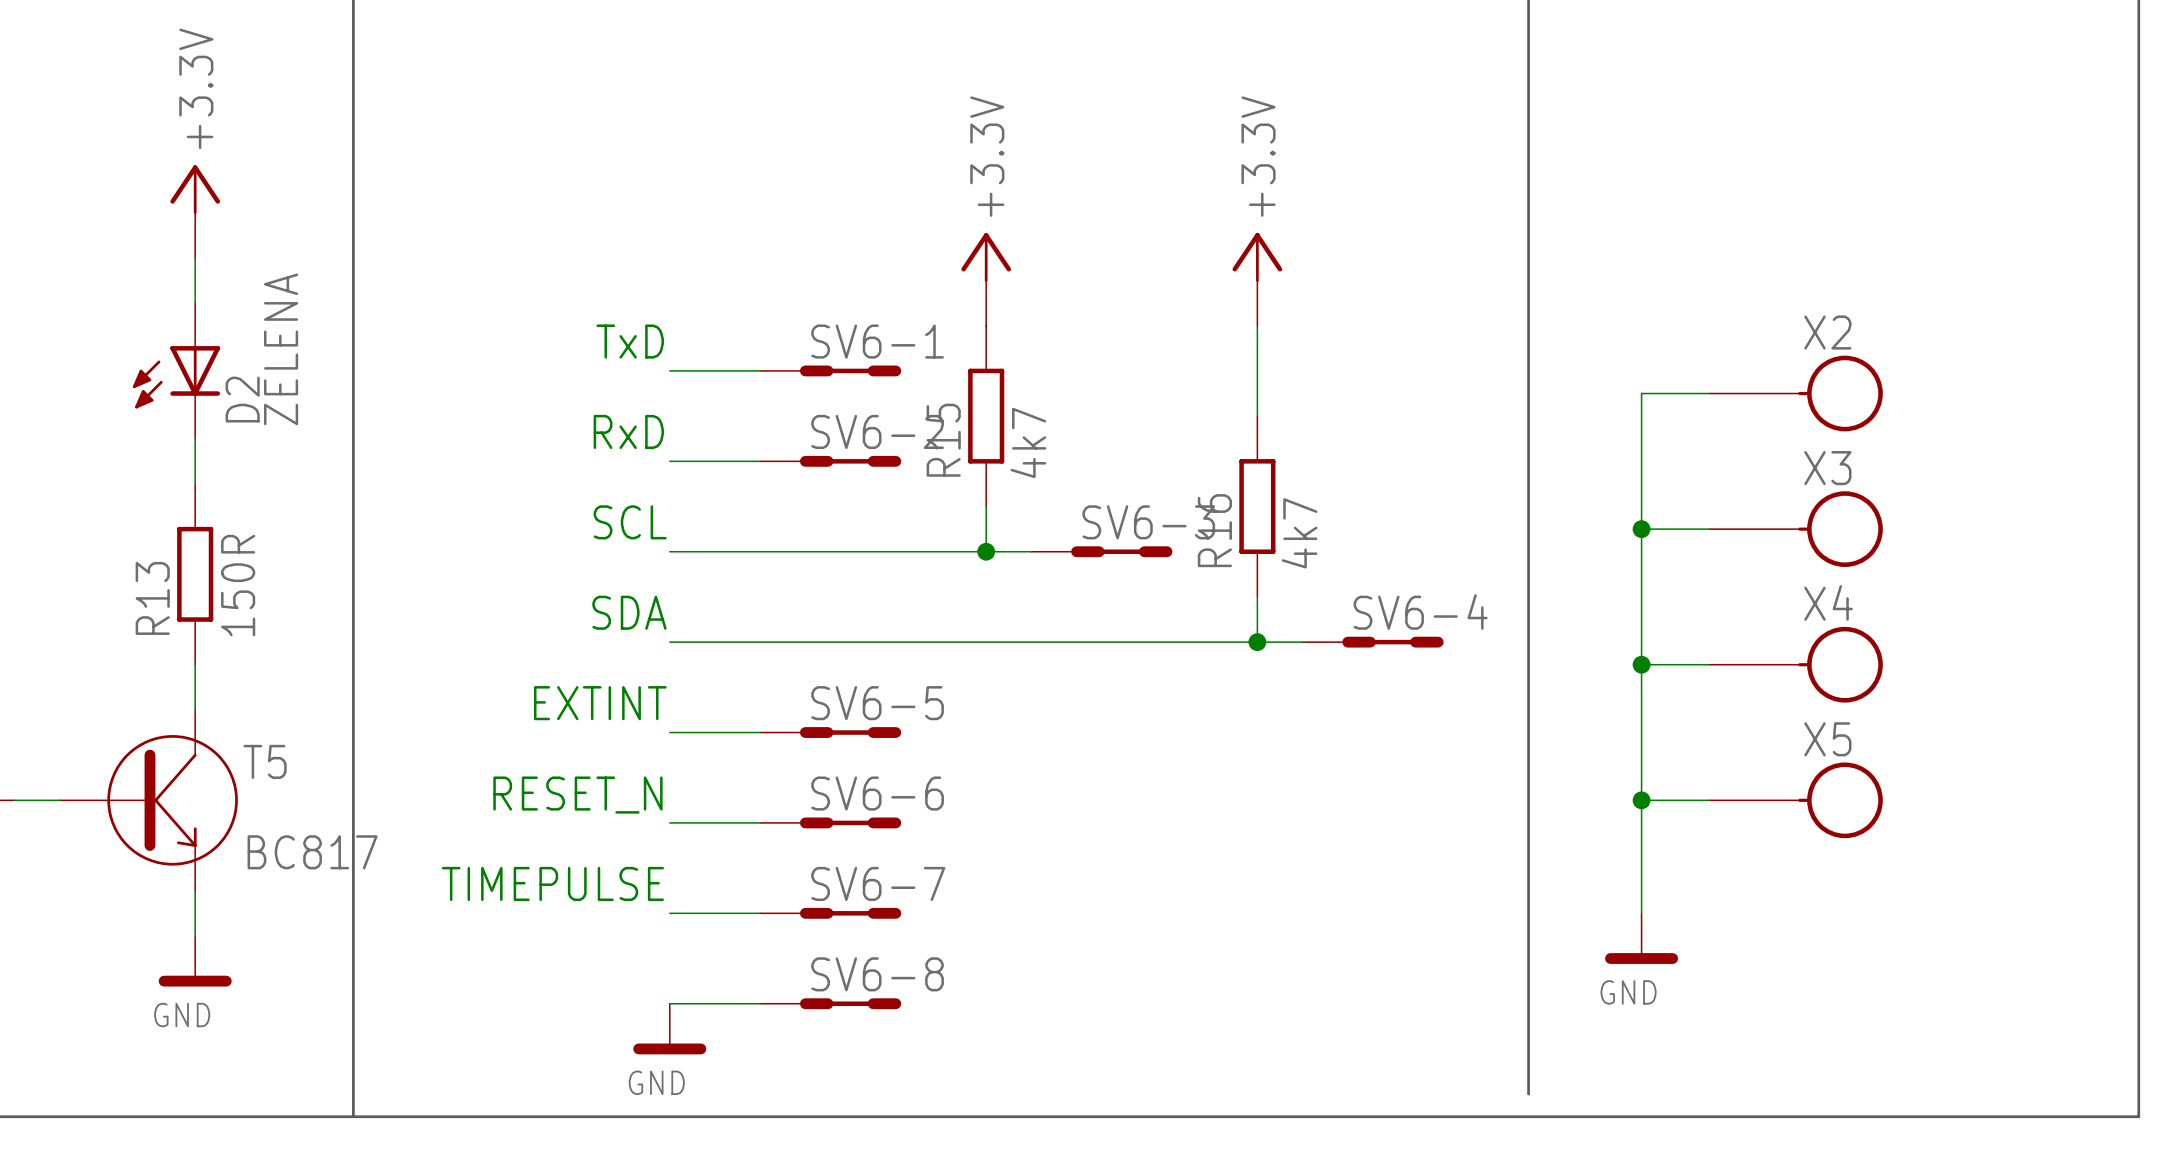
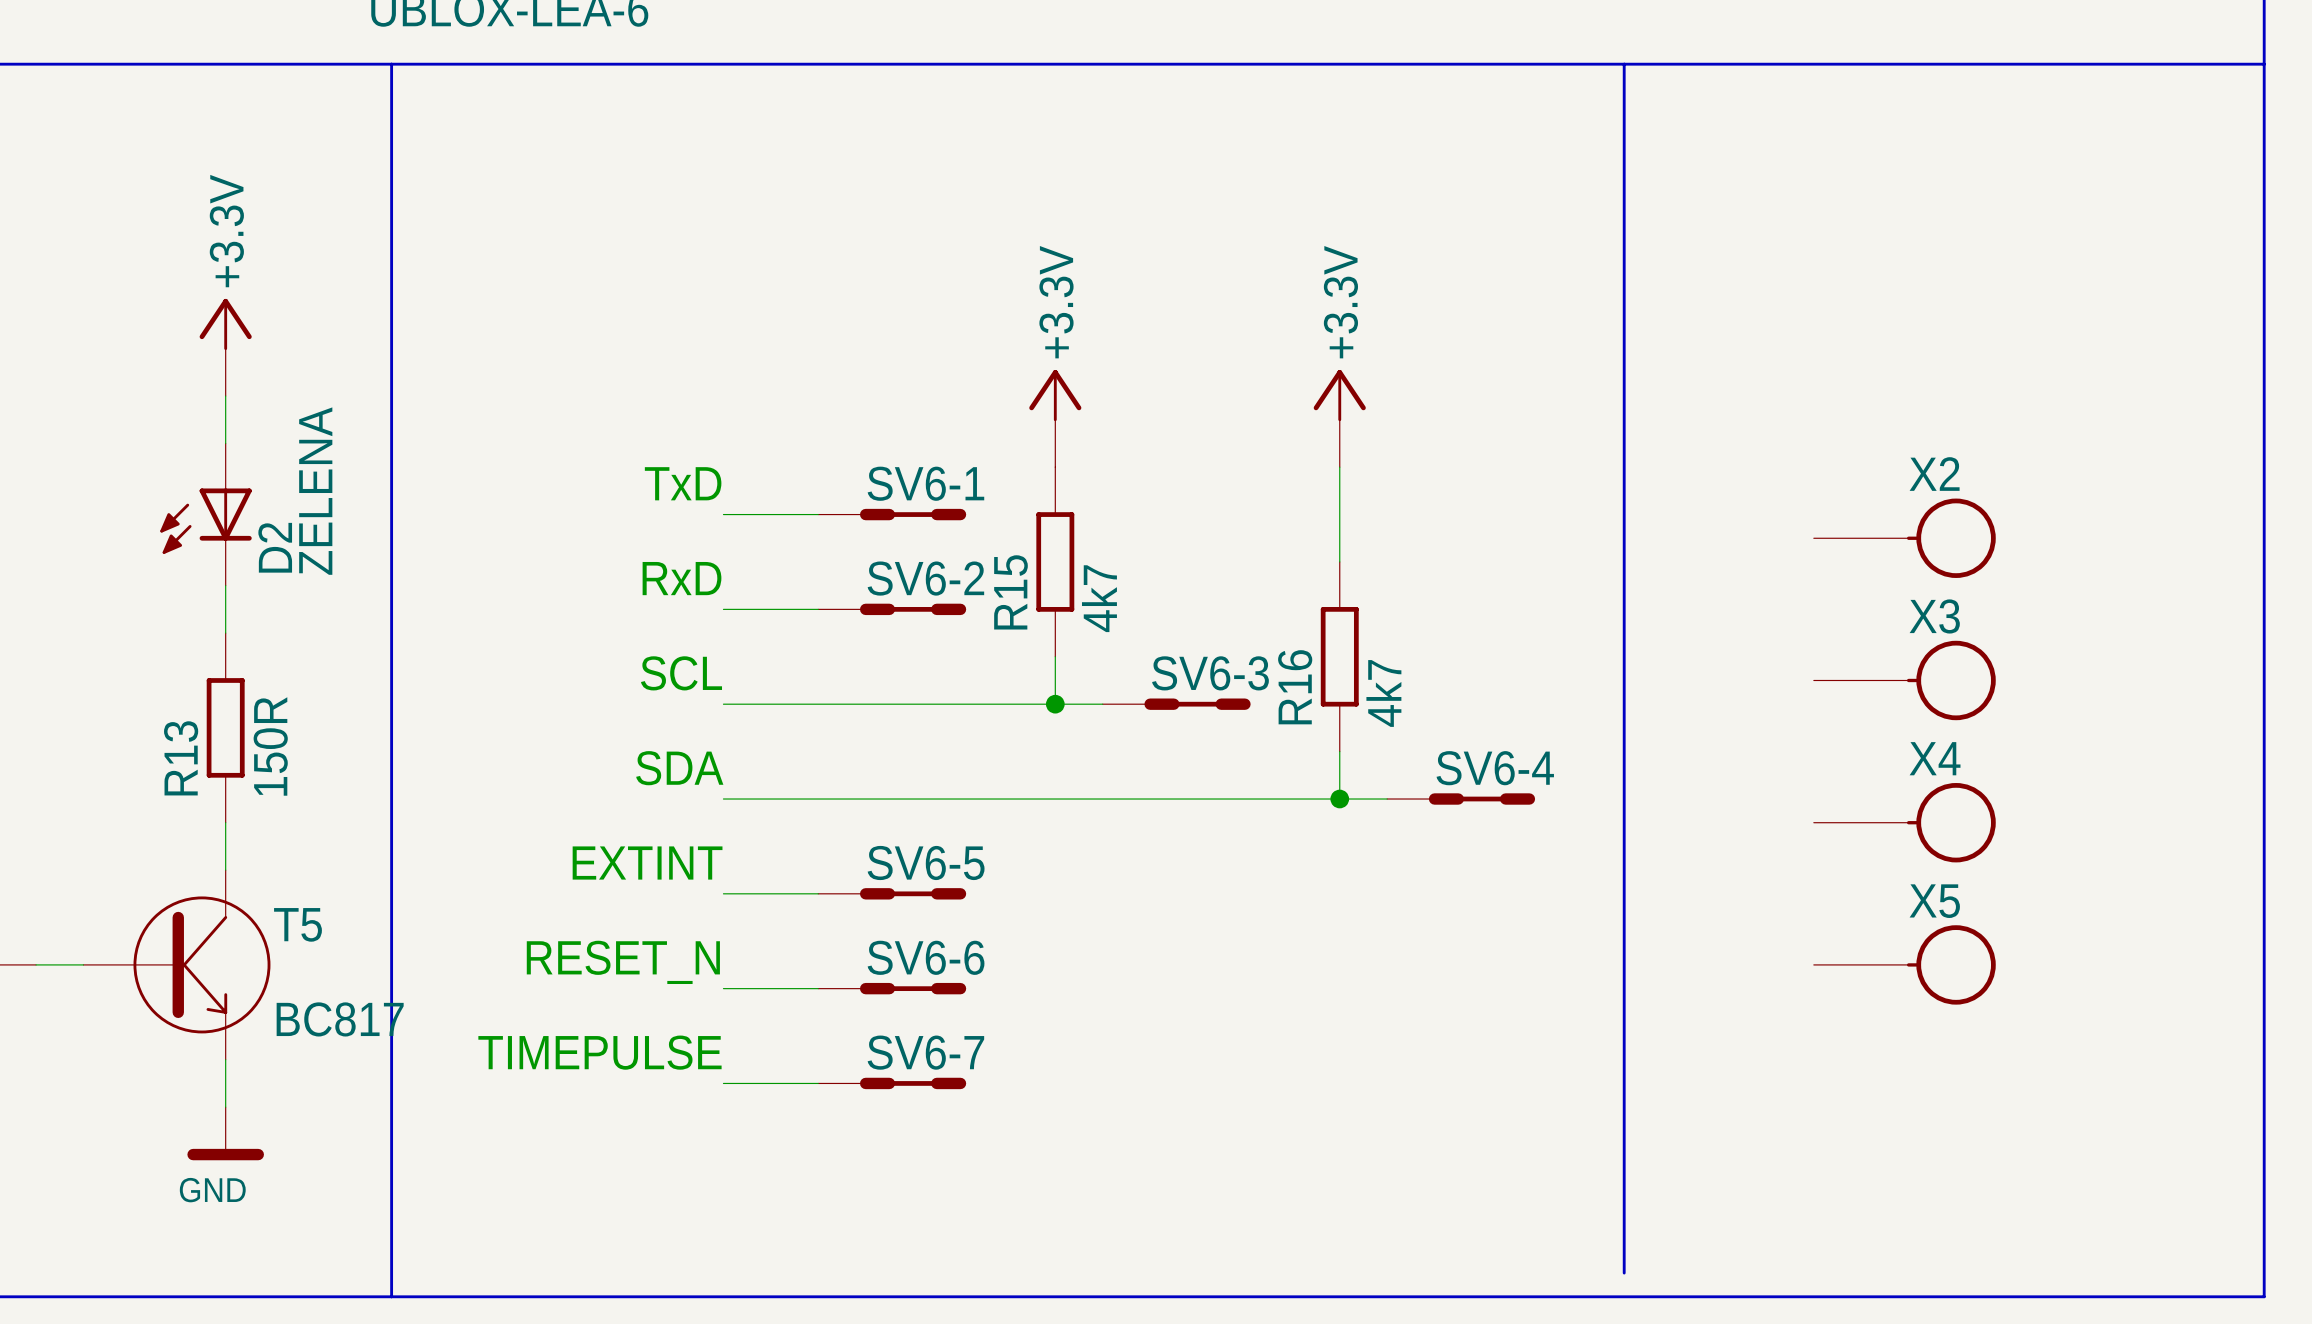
wire: (1709, 393) (1641, 393) (1641, 913) -> none
wire: (1641, 529) (1709, 529) -> none
junction: (1641, 529) -> none
wire: (1641, 664) (1709, 664) -> none
junction: (1641, 664) -> none
wire: (1641, 800) (1709, 800) -> none
junction: (1641, 800) -> none
power symbol: (1641, 938) -> none
wire: (669, 1003) (760, 1003) -> none
SV6-8: (830, 1003) -> none
power symbol: (669, 1029) -> none

